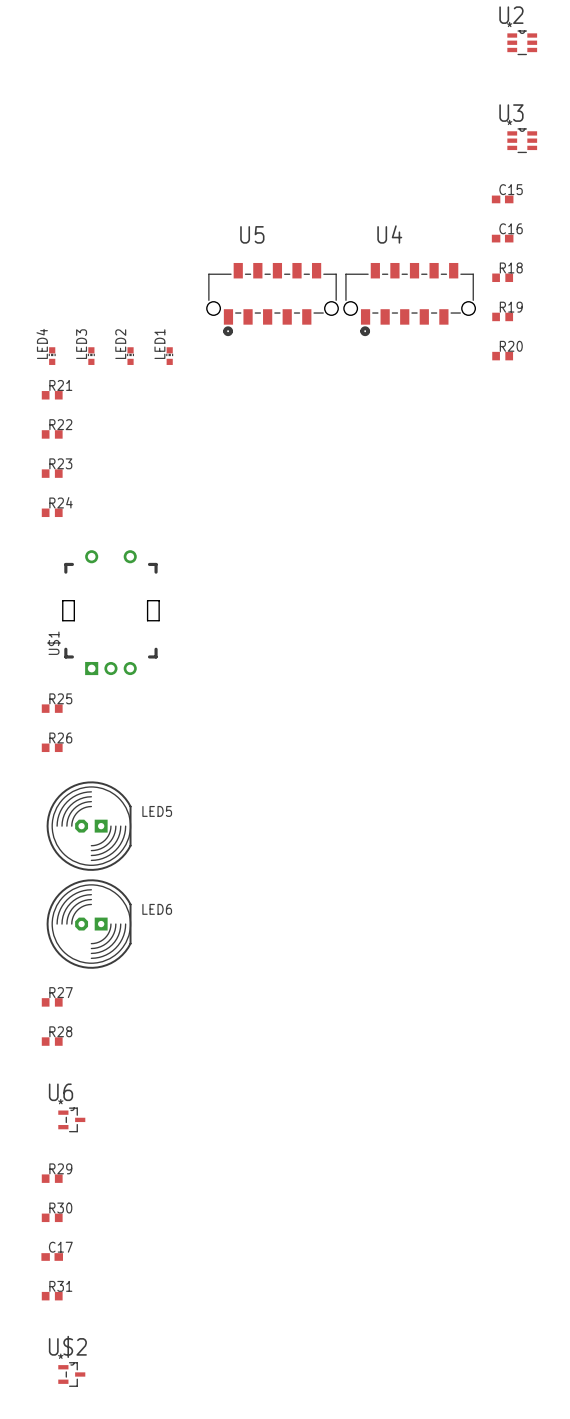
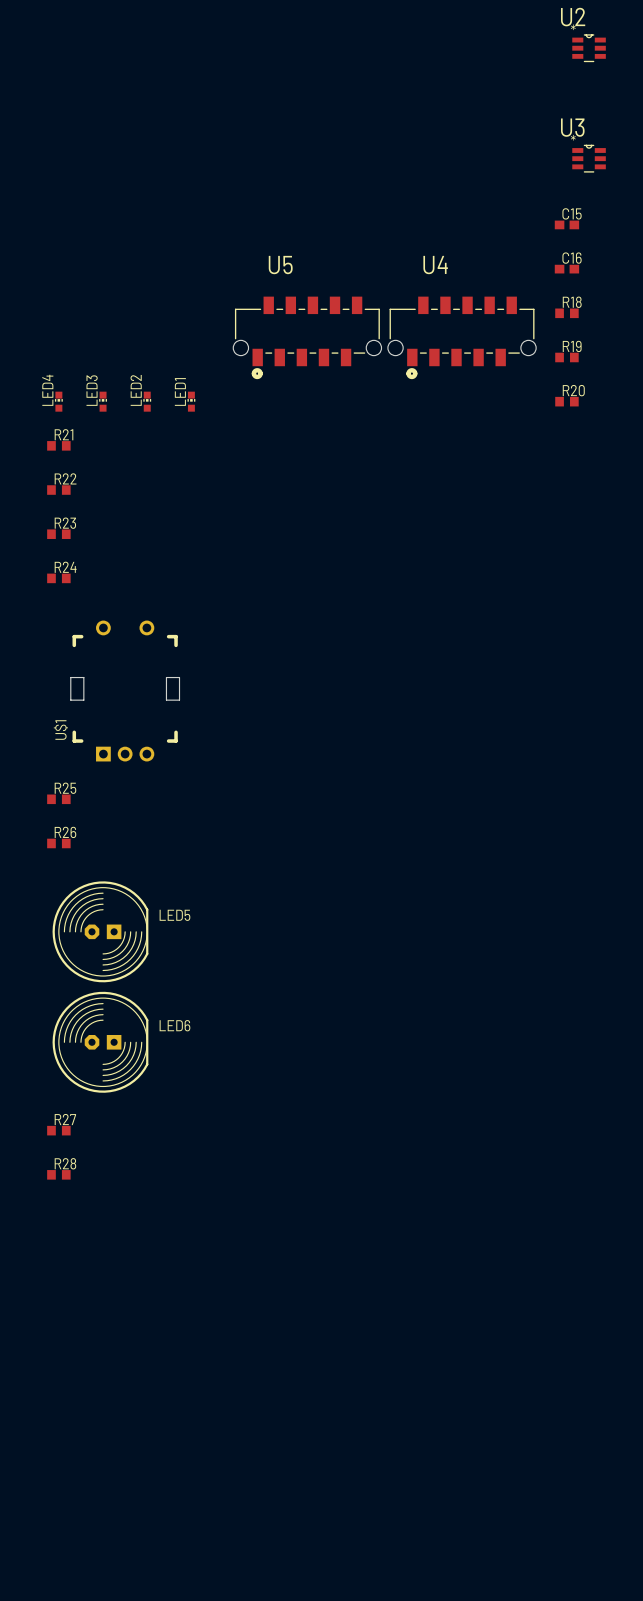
U6: (71, 1119) -> none
R29: (52, 1178) -> none
R30: (52, 1217) -> none
C17: (52, 1256) -> none
R31: (52, 1296) -> none
U$2: (71, 1374) -> none

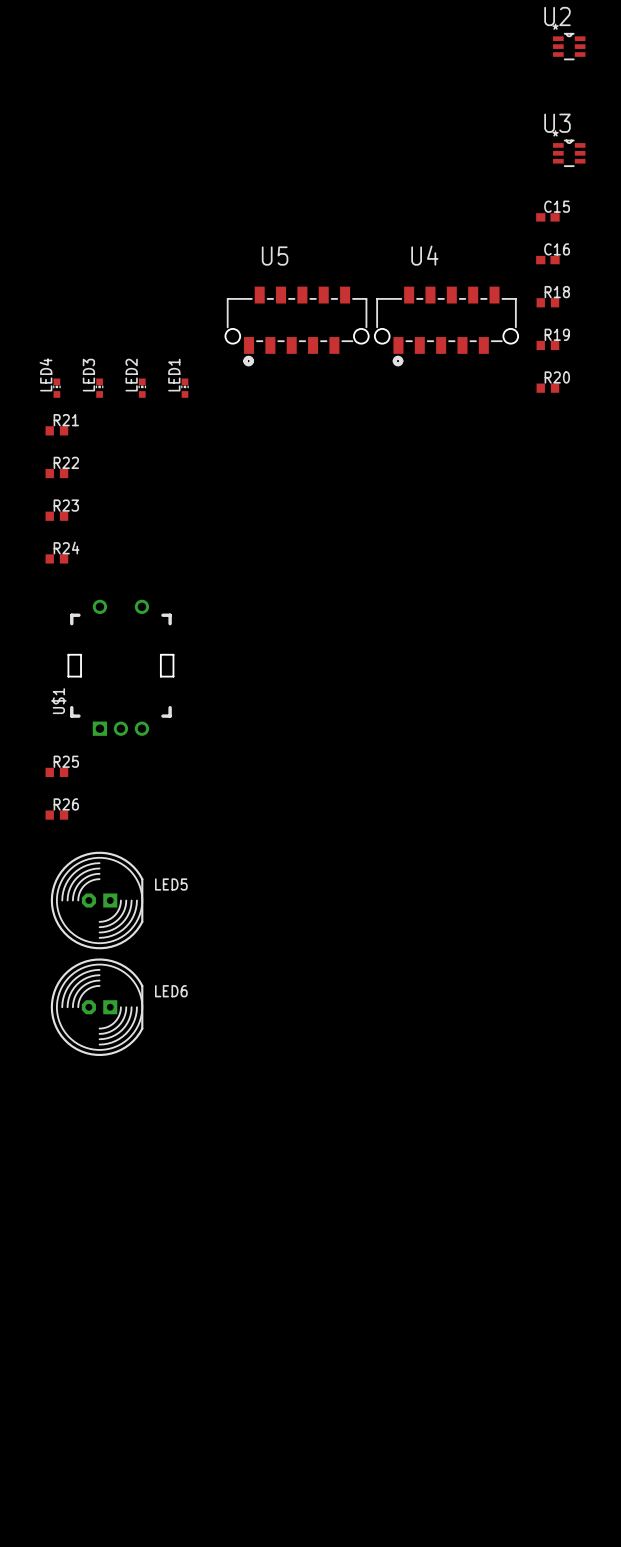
R27: (58, 1130) -> none
R28: (58, 1174) -> none

